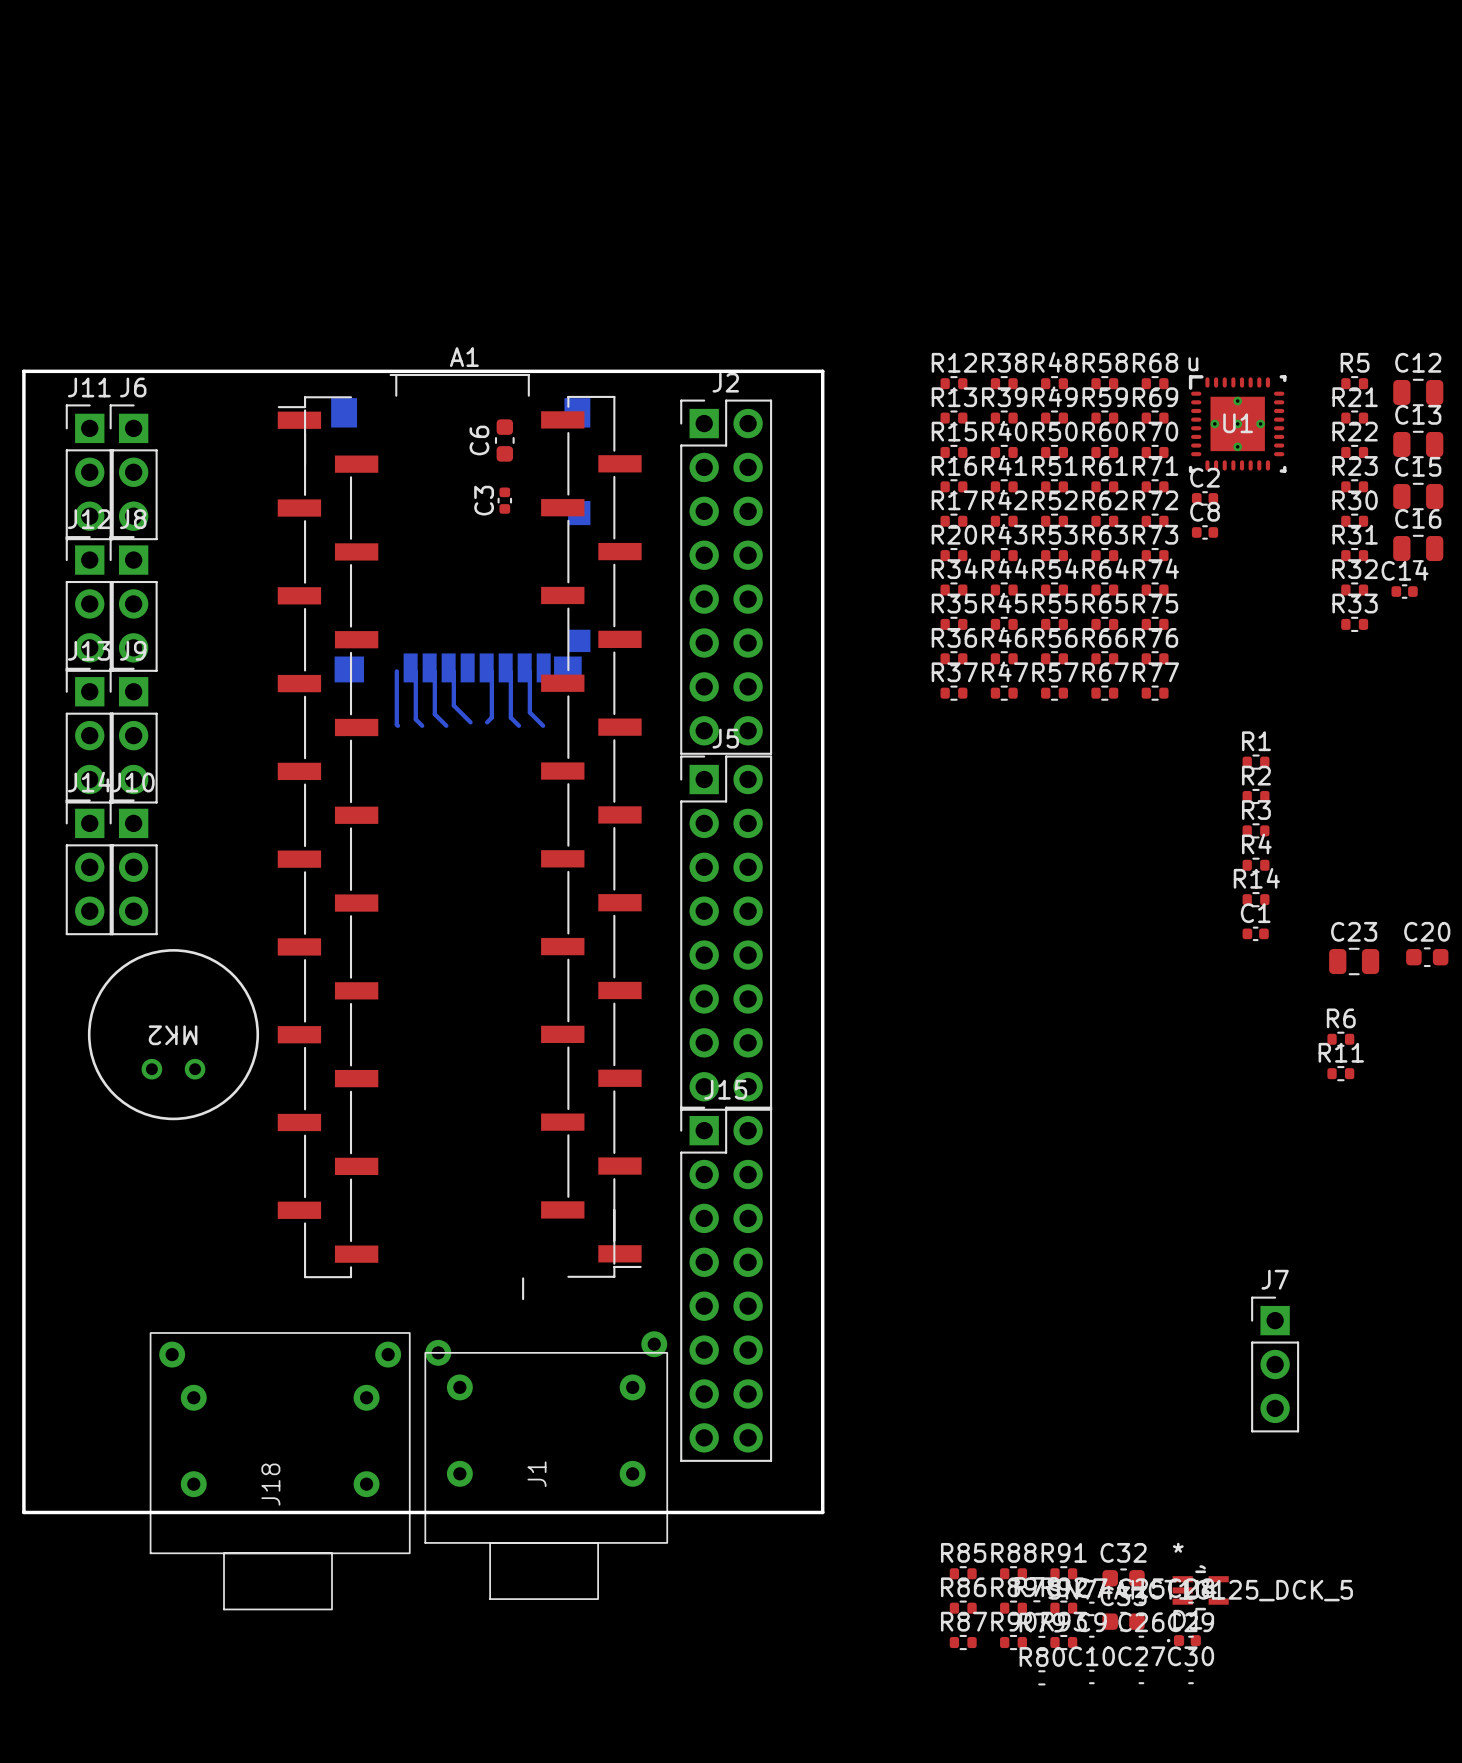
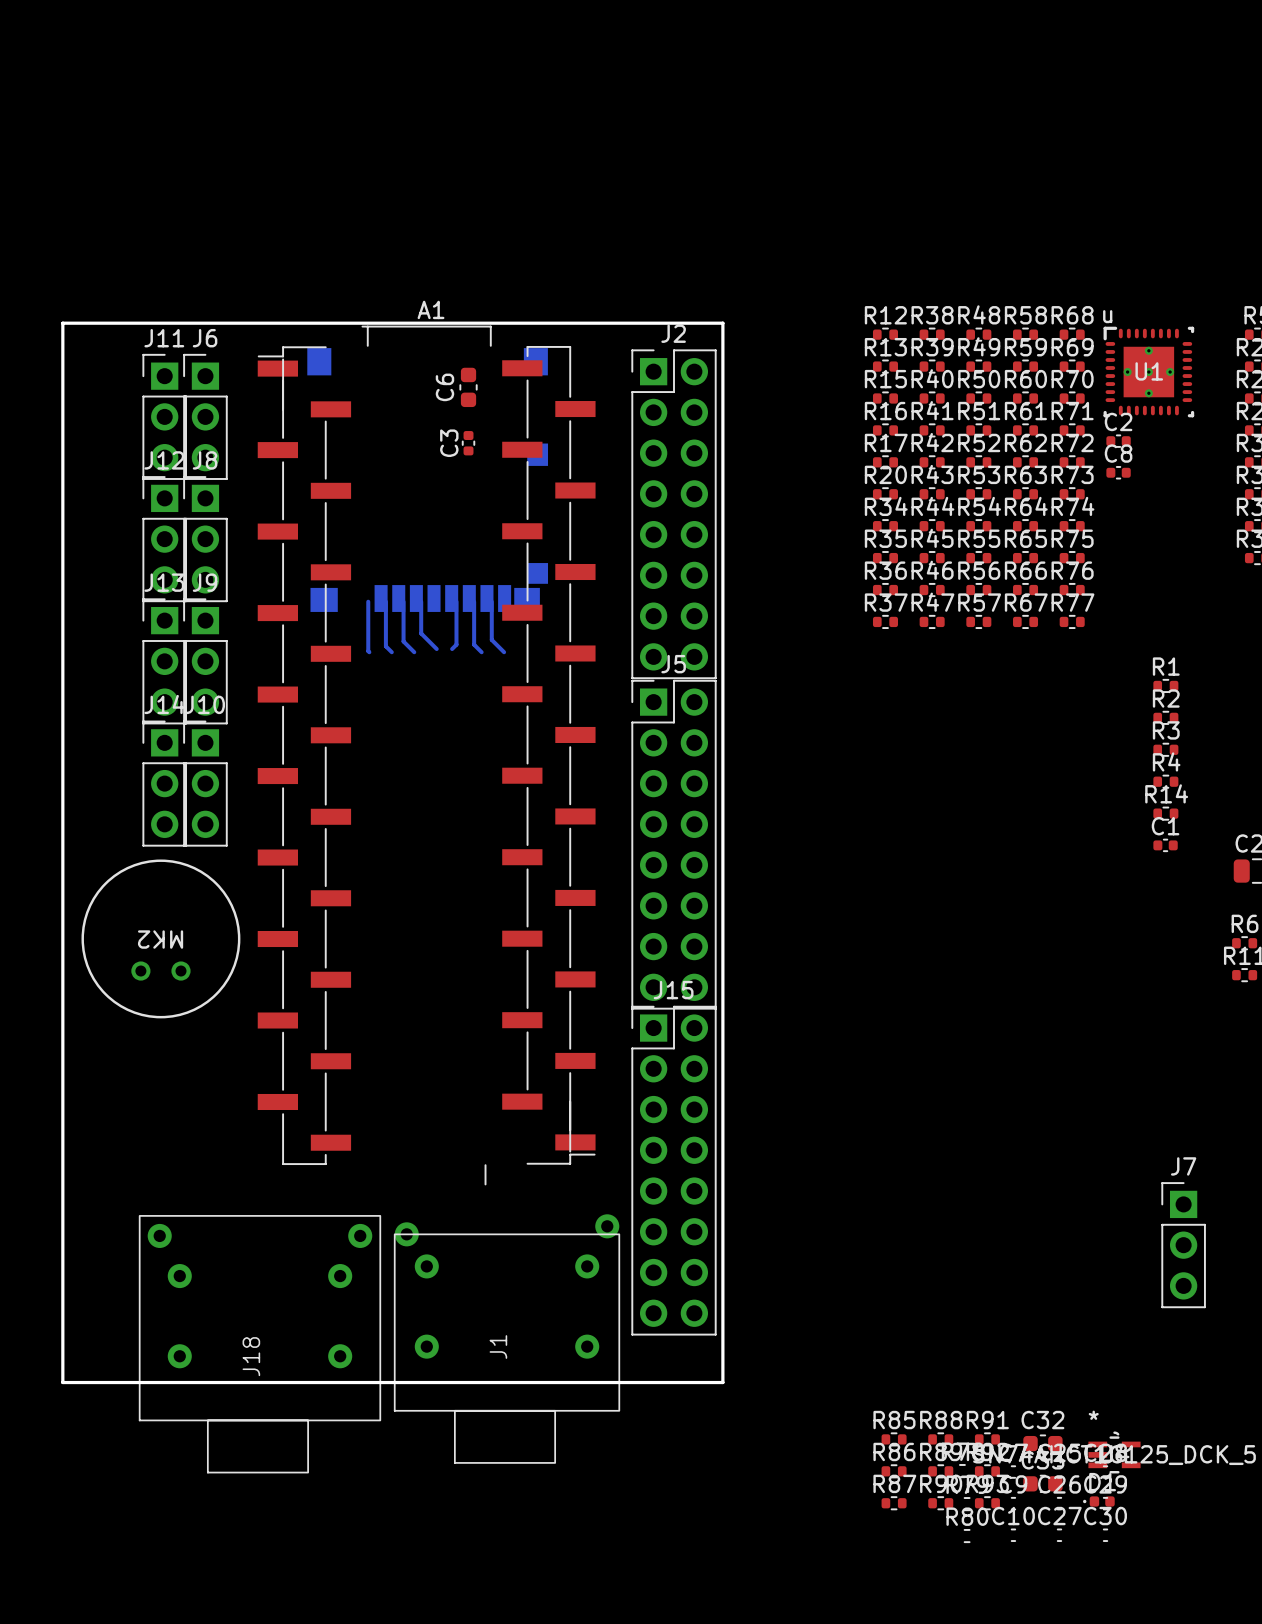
board edge: (67, 371) (23, 371) (23, 1512) (67, 1512) -> (62, 323) (62, 1382)
board edge: (778, 371) (822, 371) (822, 1512) (778, 1512) -> (722, 323) (722, 1382)
J11 position: (89, 472) -> (164, 416)
J6 position: (133, 472) -> (205, 416)
J12 position: (89, 603) -> (164, 539)
J8 position: (133, 603) -> (205, 539)
J13 position: (89, 735) -> (164, 661)
J9 position: (133, 735) -> (205, 661)
J14 position: (89, 867) -> (164, 783)
J10 position: (133, 867) -> (205, 783)

